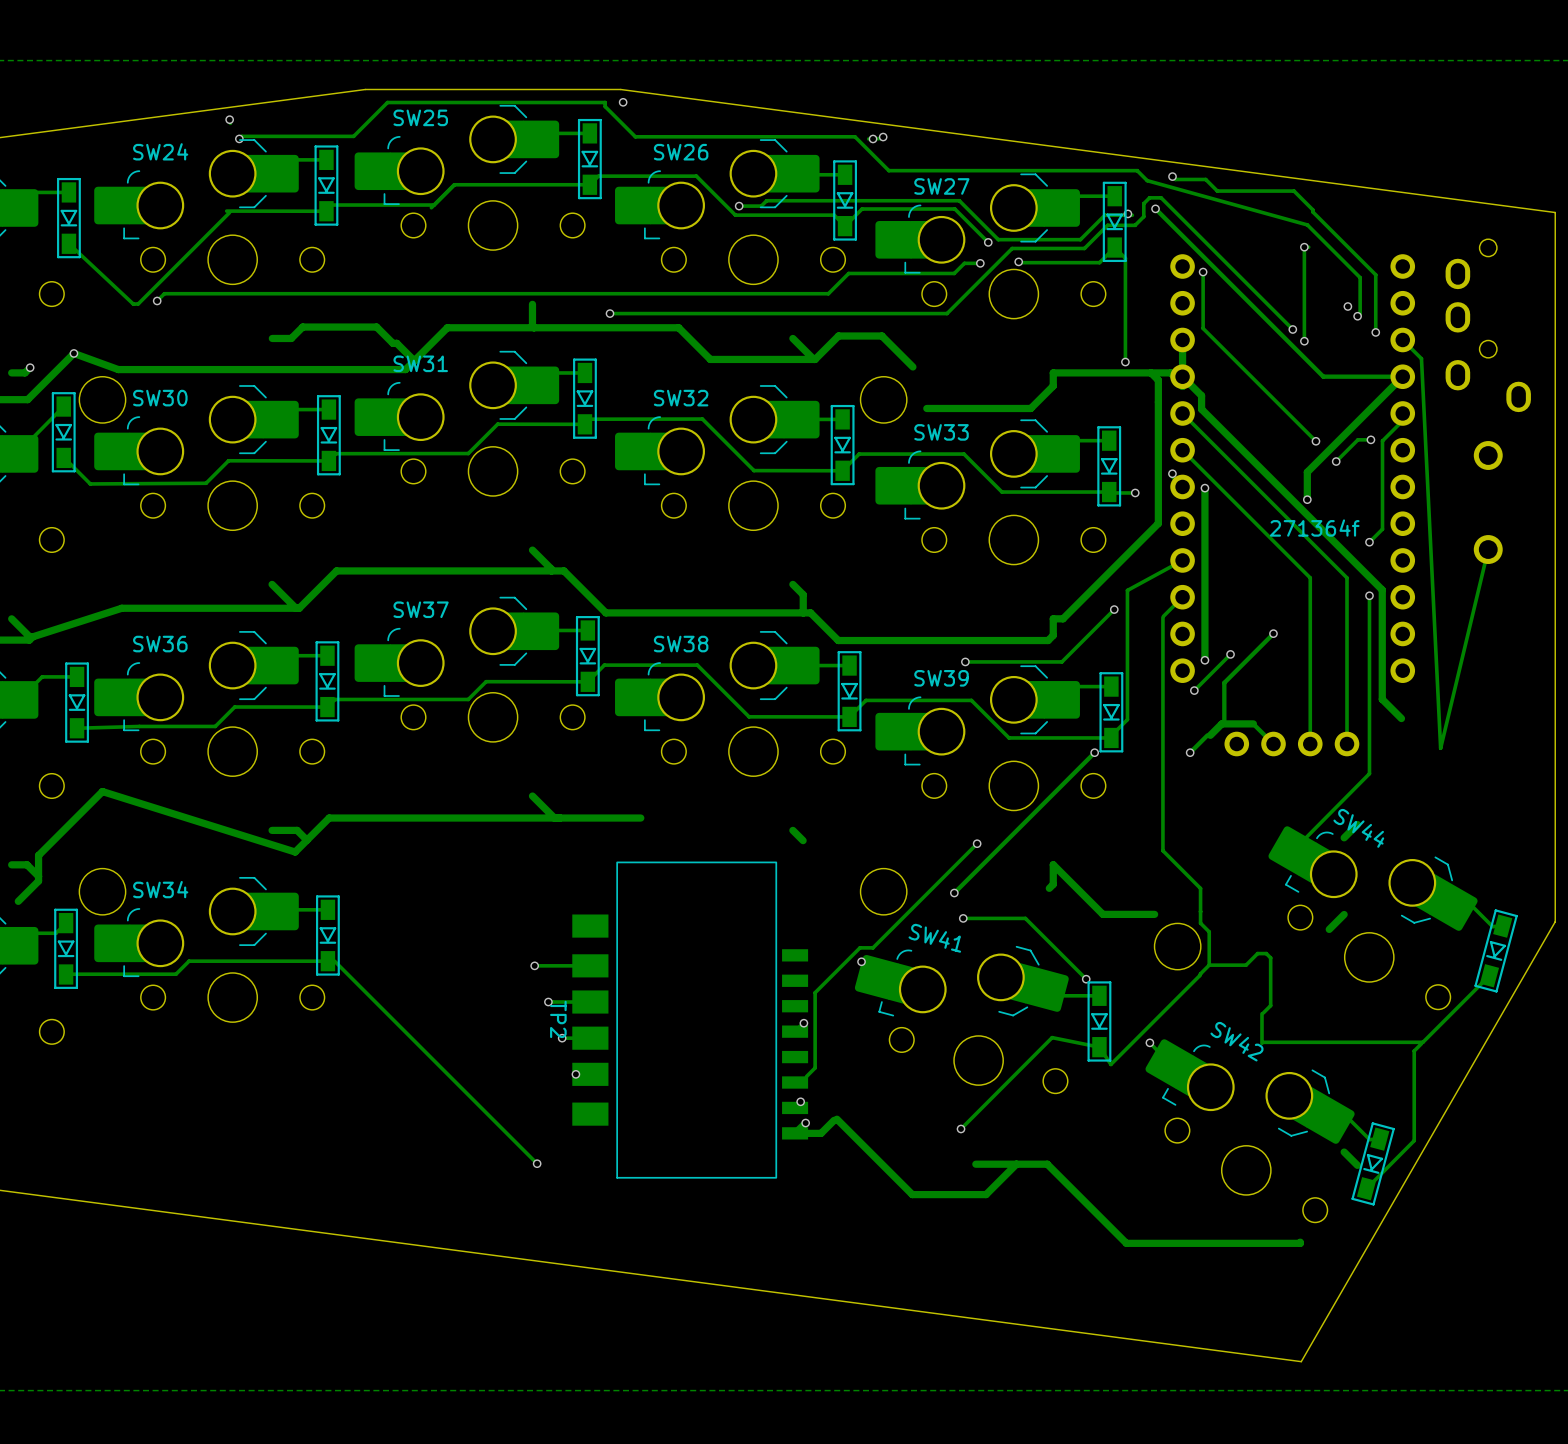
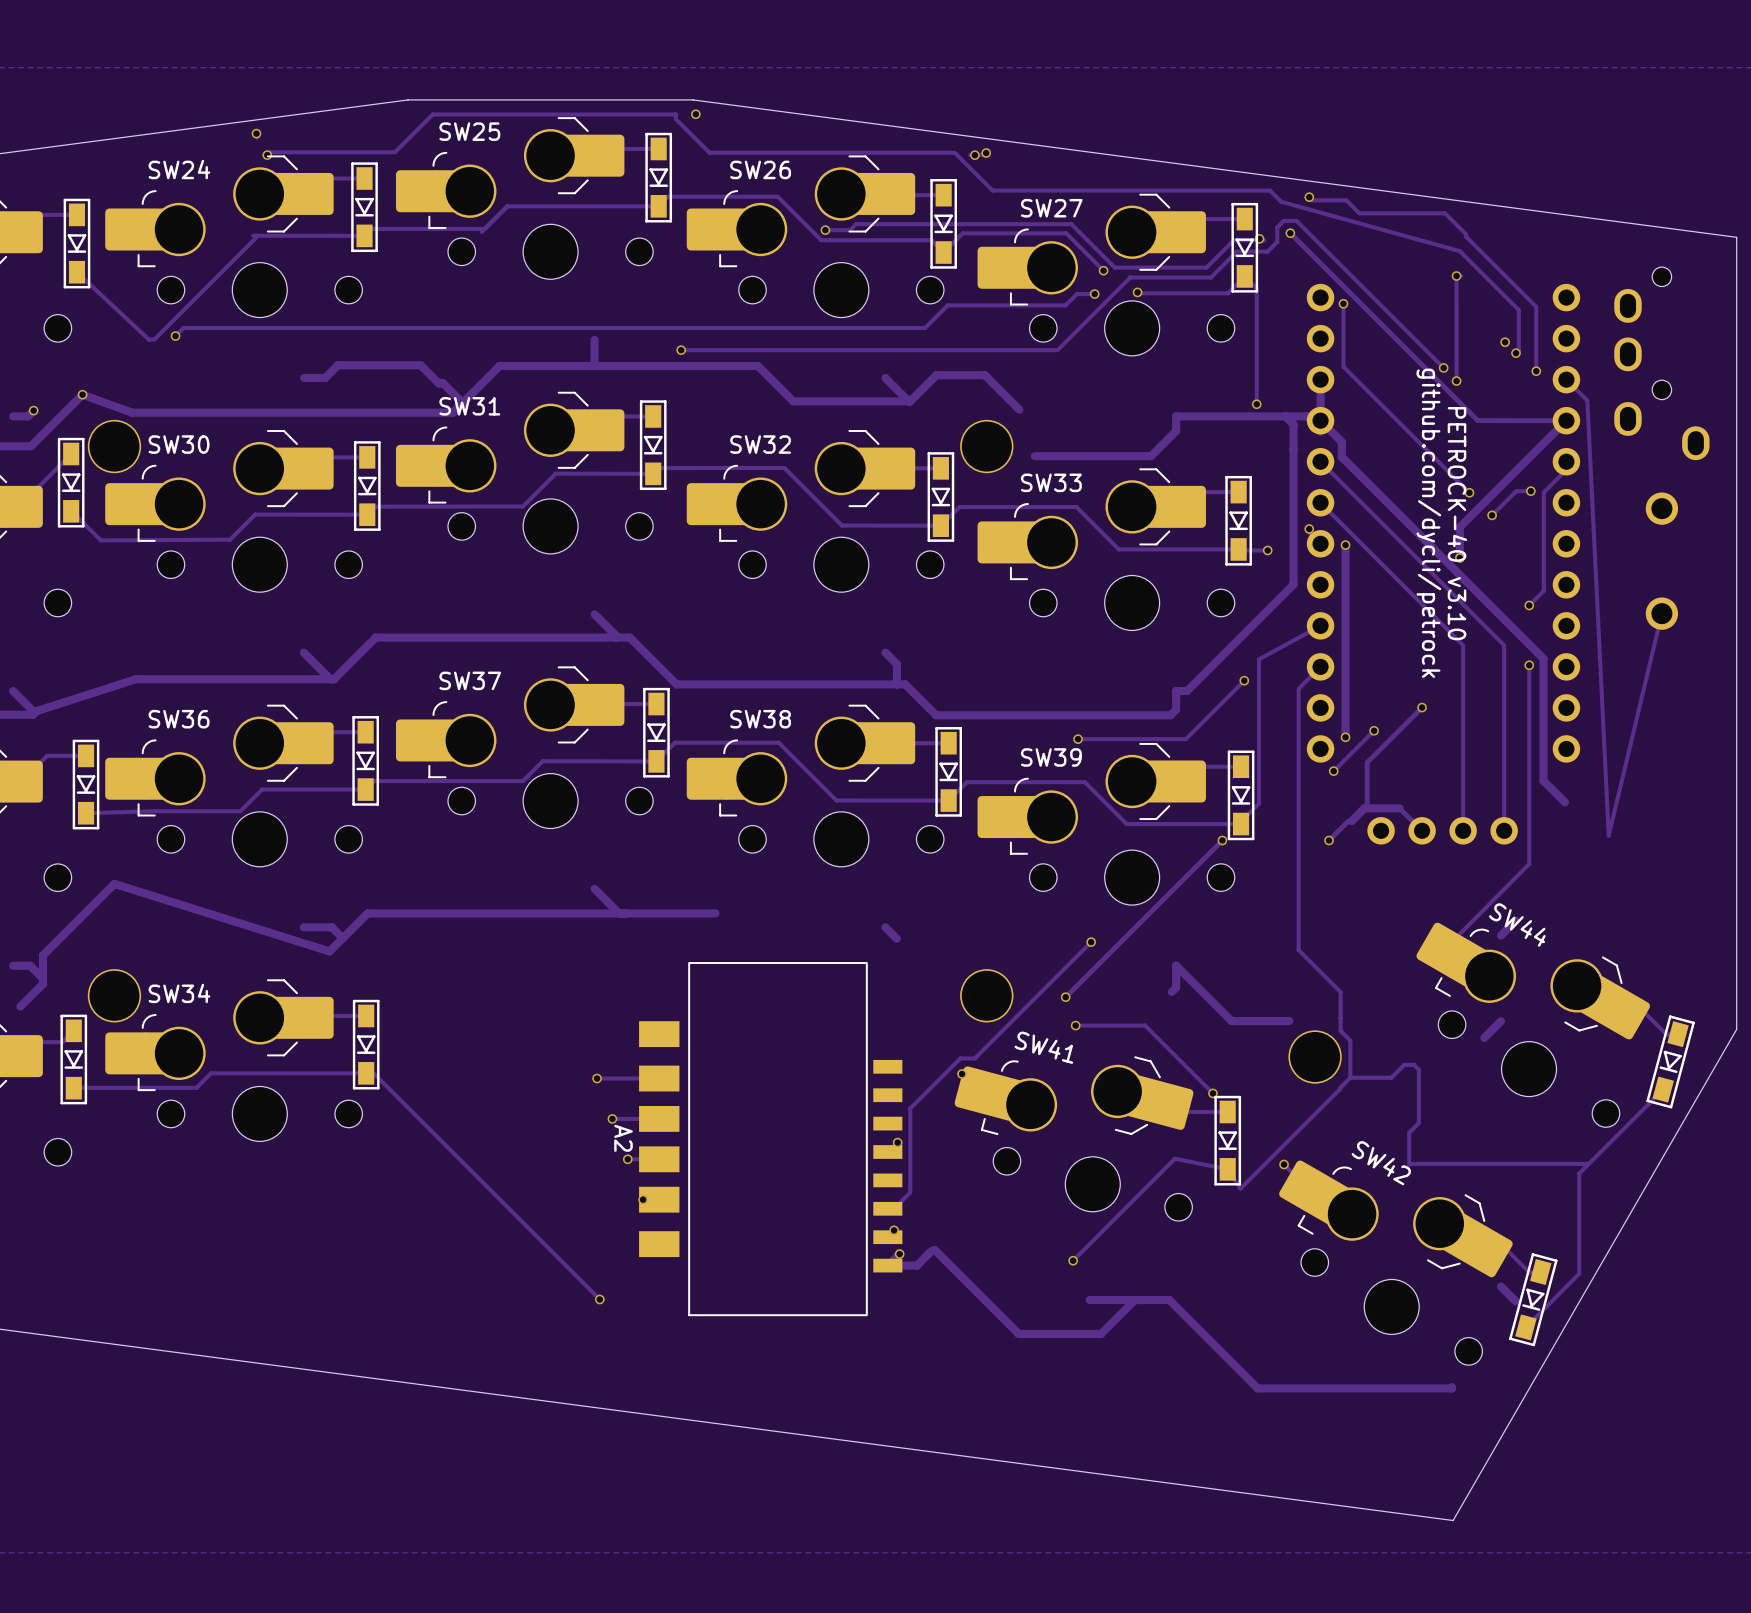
text: none -> github.com/dycli/petrock (1428, 523)
text: none -> PETROCK-40 v3.10 (1457, 523)
text: 271364f (1314, 528) -> none
TP2 name: TP2 (558, 1019) -> A2 (623, 1138)

